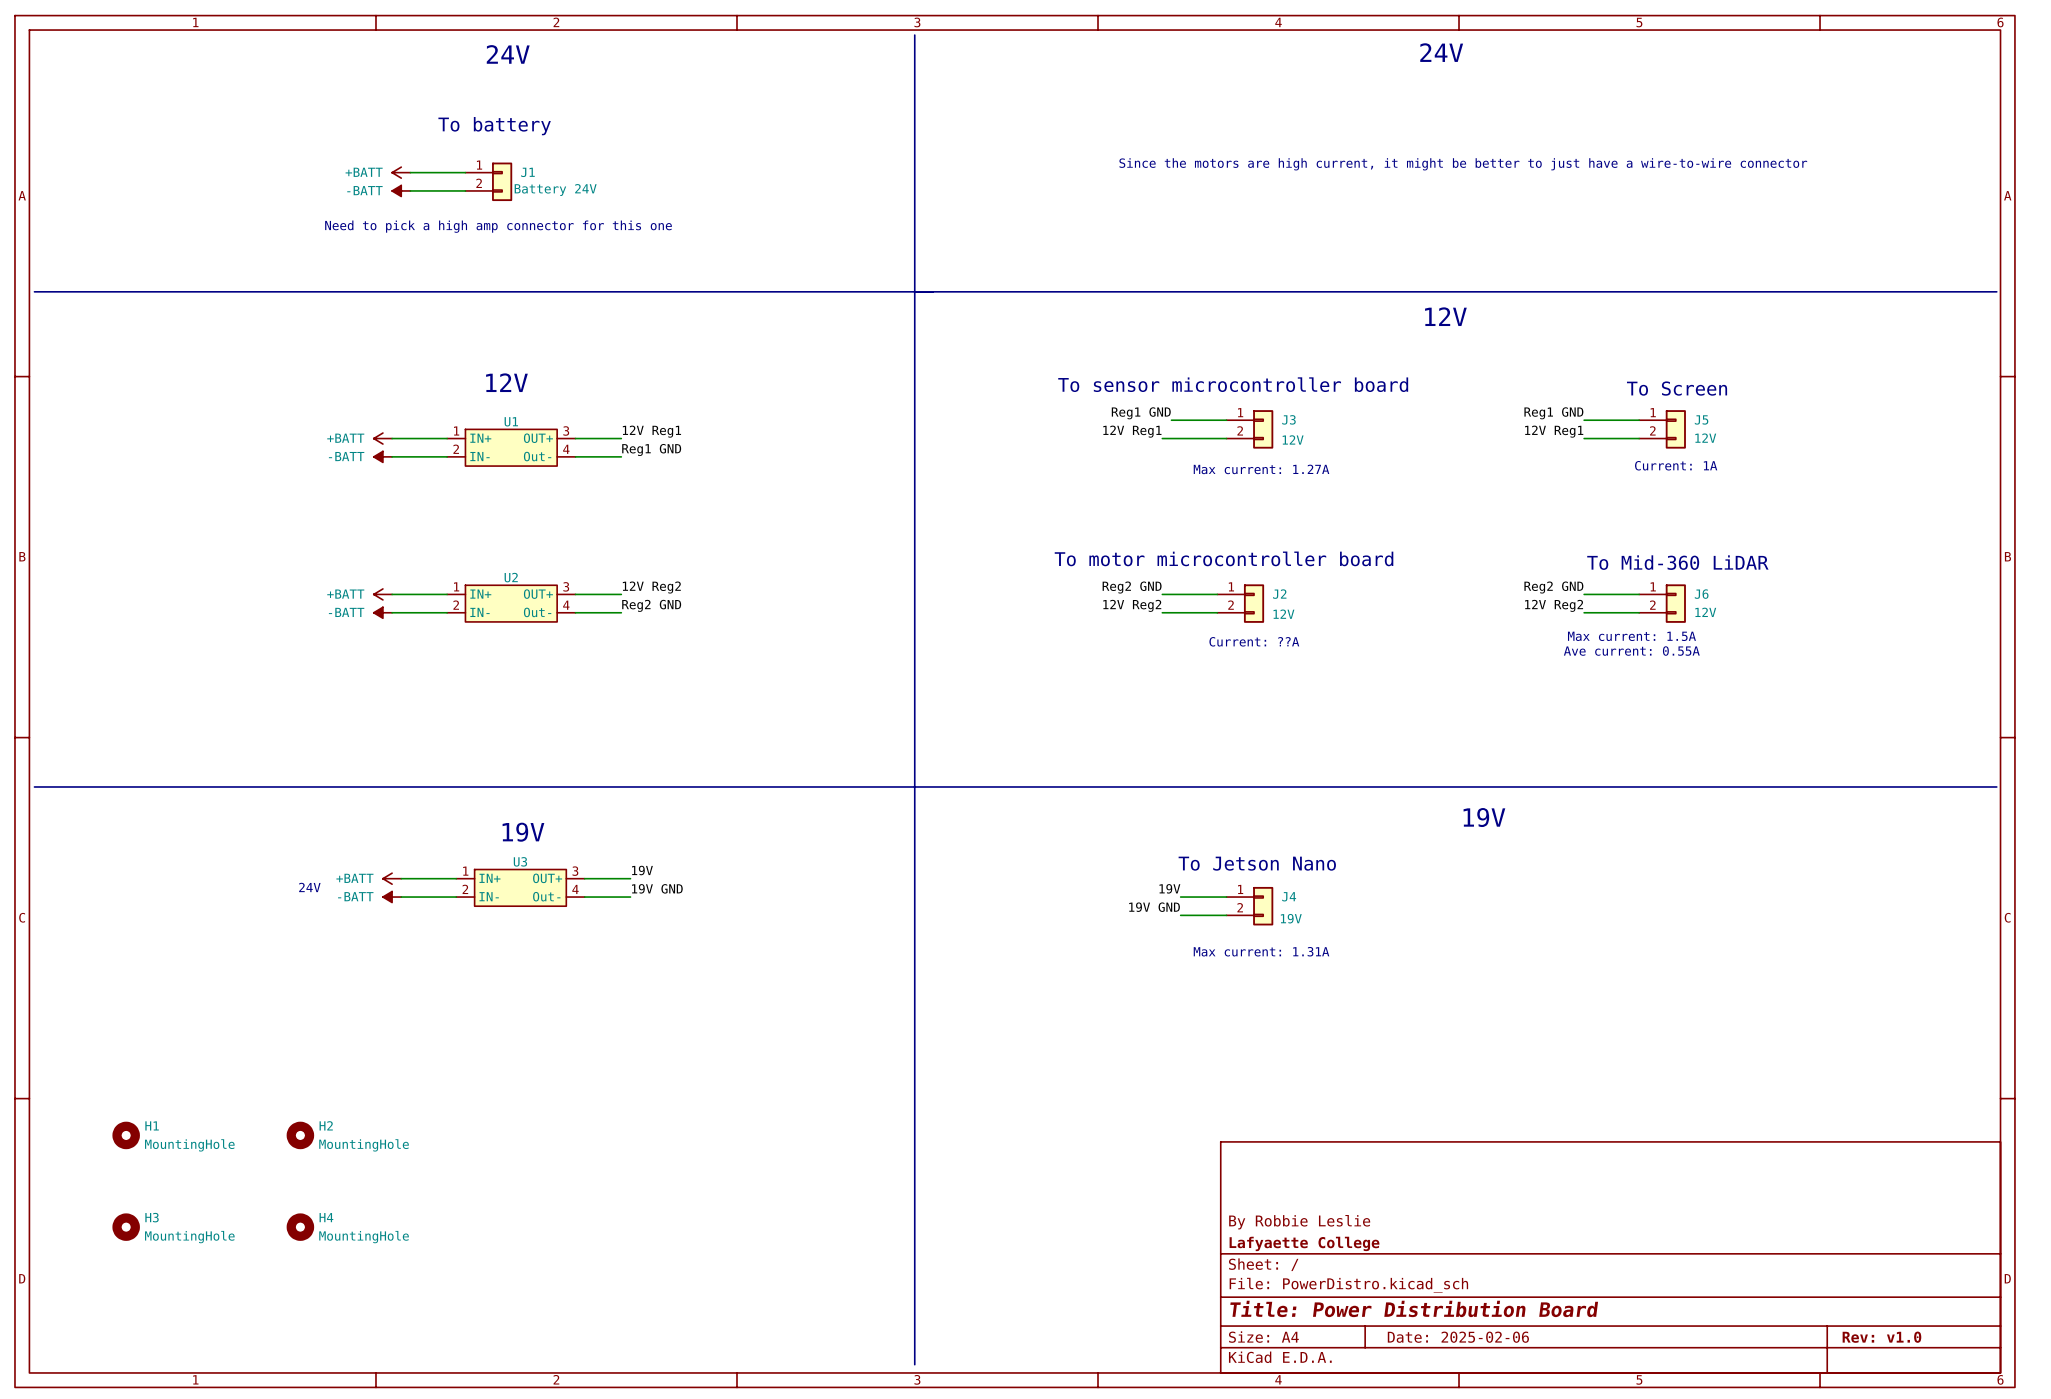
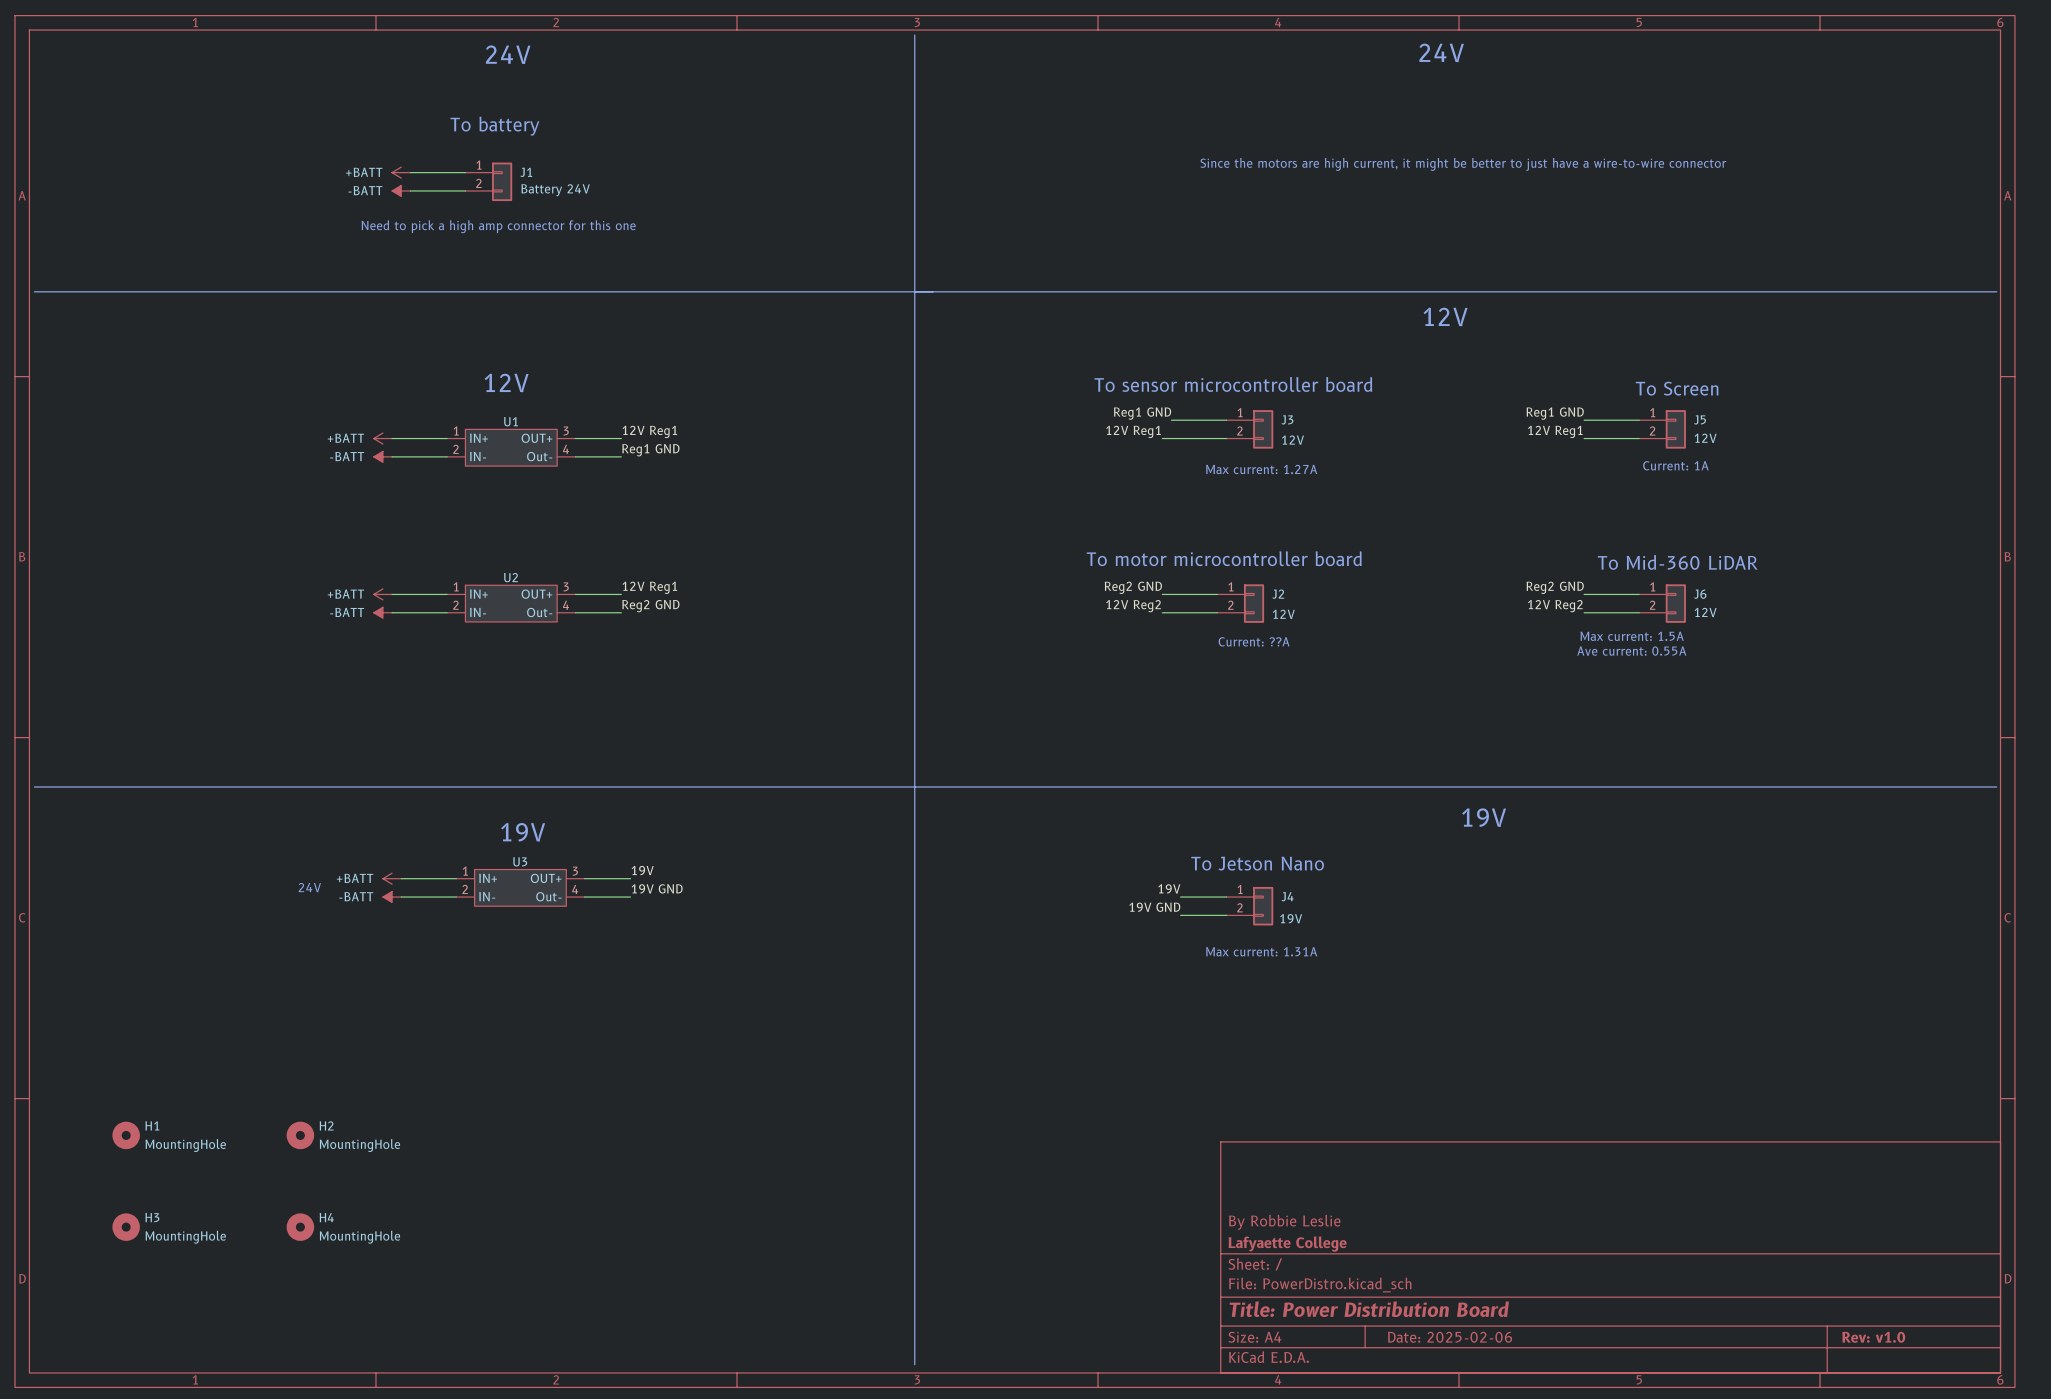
label: 12V Reg2 (651, 587) -> 12V Reg1 (649, 587)

